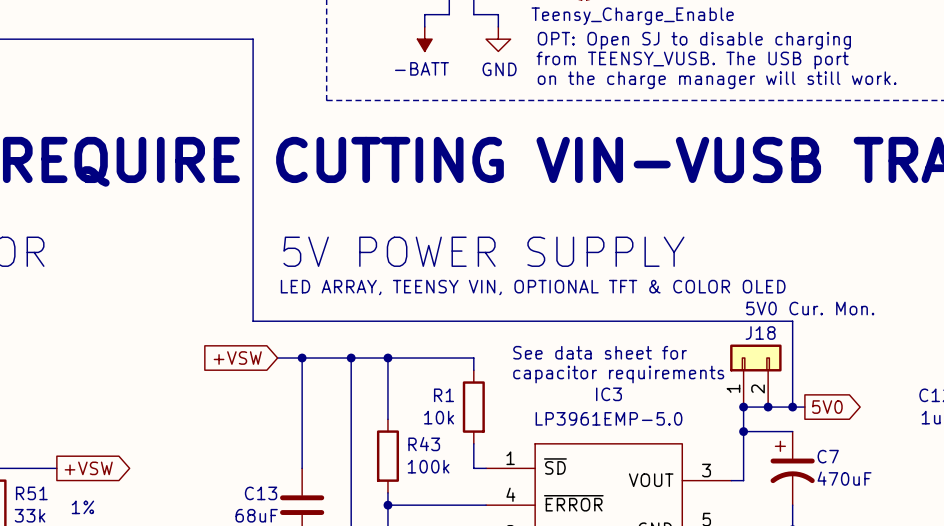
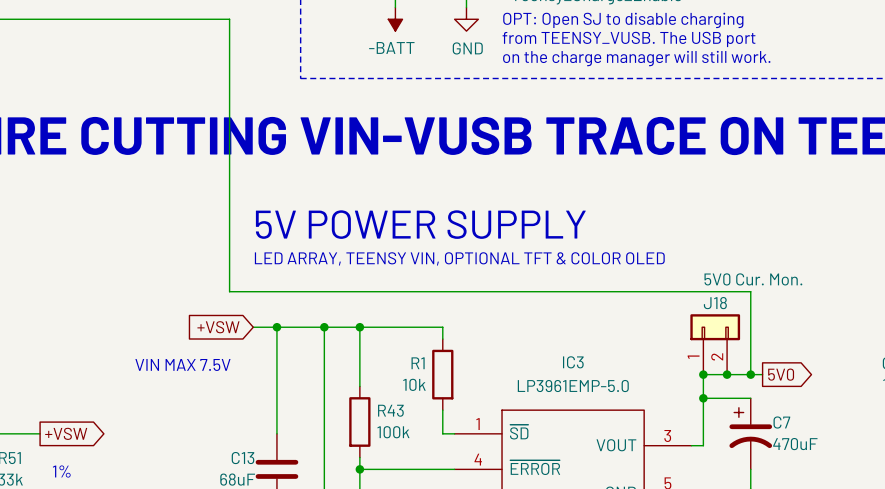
text: See data sheet for (600, 352) -> none
text: capacitor requirements (618, 374) -> none
text: none -> VIN MAX 7.5V (182, 364)

